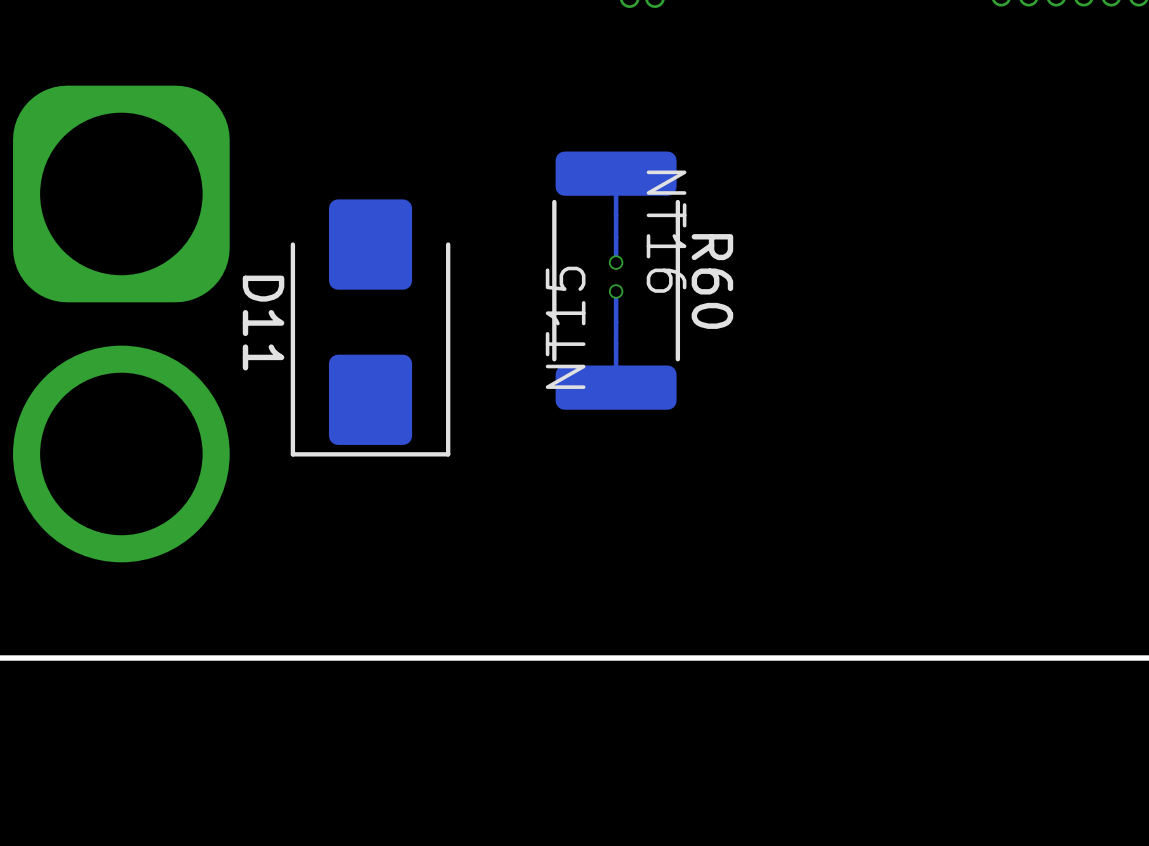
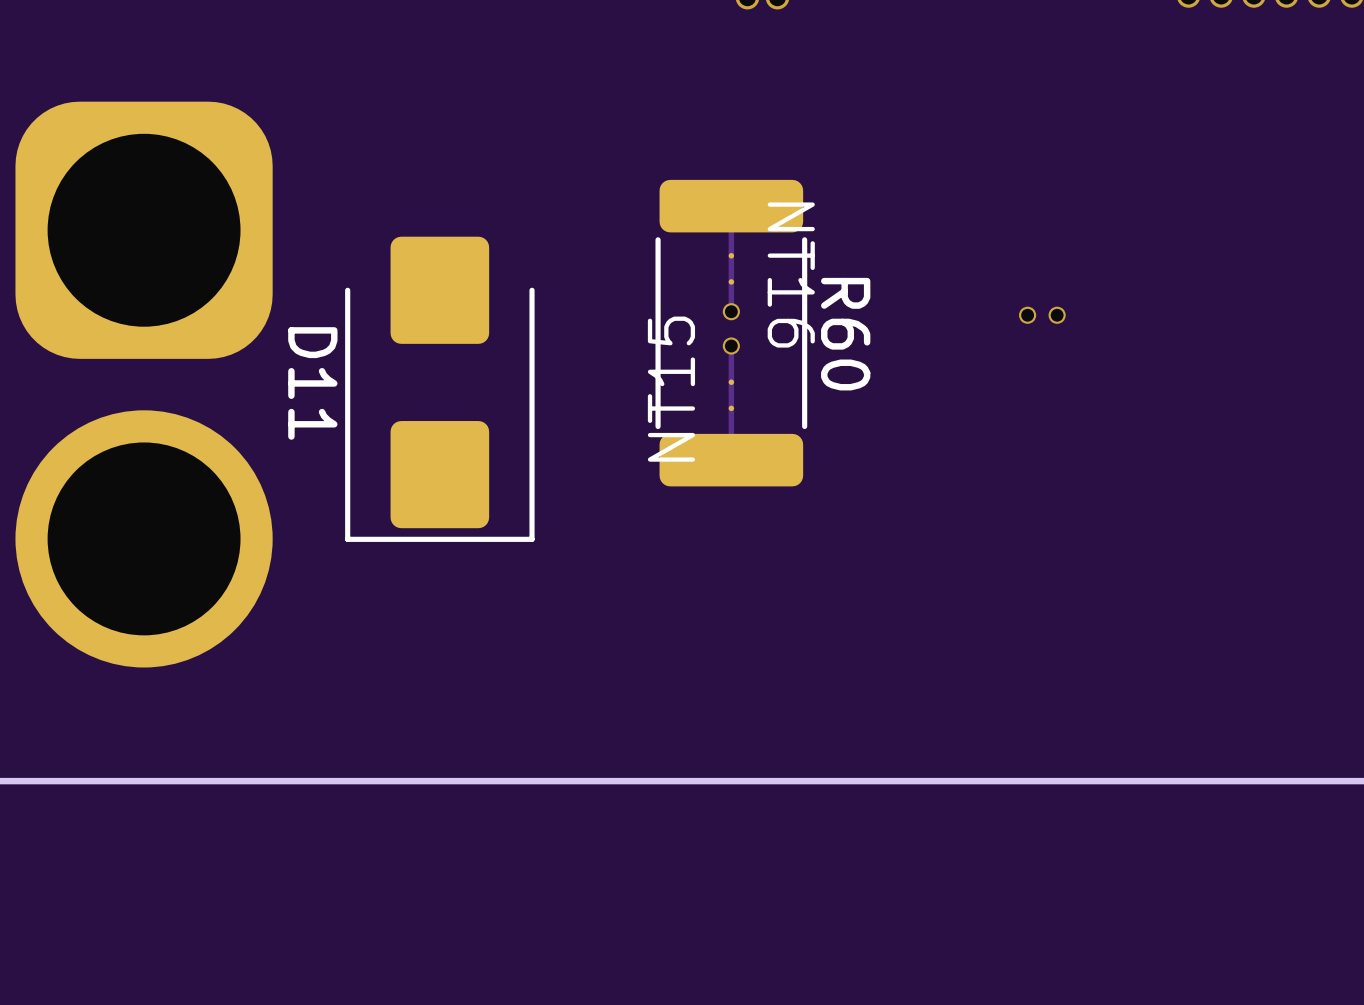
via: none -> (1027, 315)
via: none -> (1057, 315)

